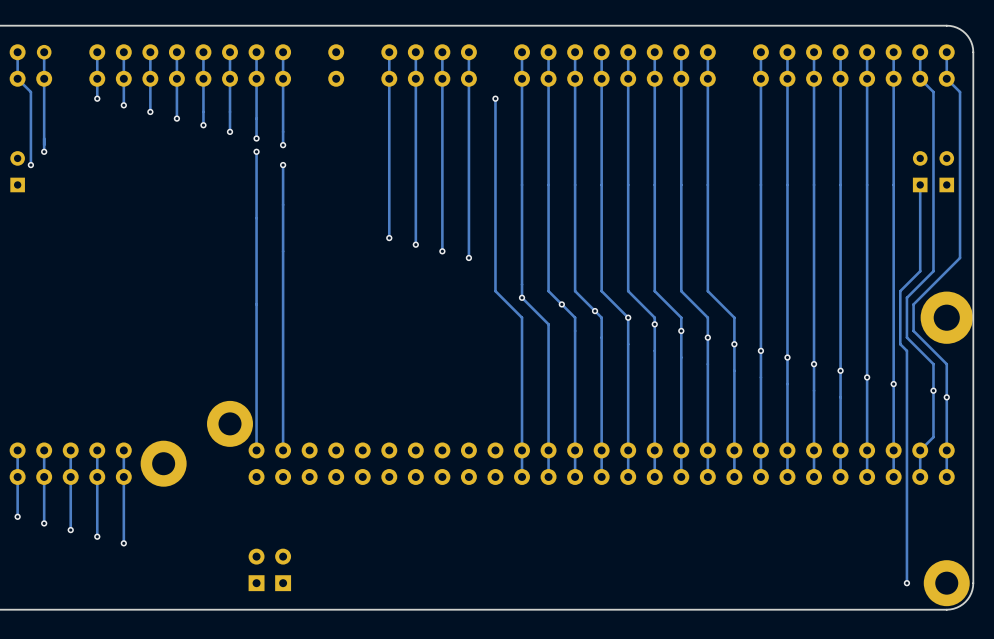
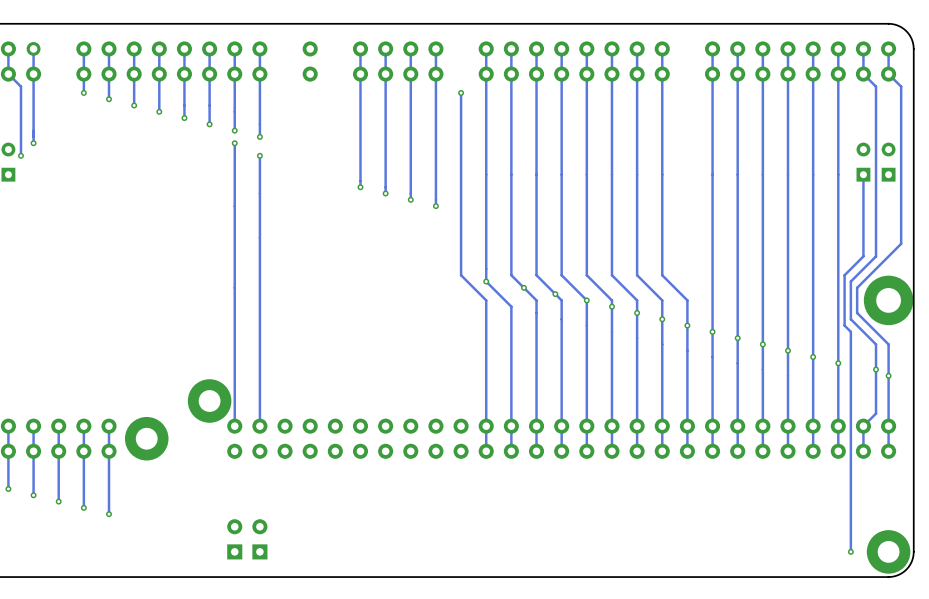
track: (389, 198) (389, 238) -> none
via: none -> (360, 187)
track: (415, 204) (415, 244) -> none
via: none -> (385, 193)
track: (442, 211) (442, 251) -> none
via: none -> (410, 199)
track: (468, 218) (468, 257) -> none
via: none -> (435, 206)
via: (389, 238) -> none
via: (415, 244) -> none
via: (442, 251) -> none
via: (468, 257) -> none

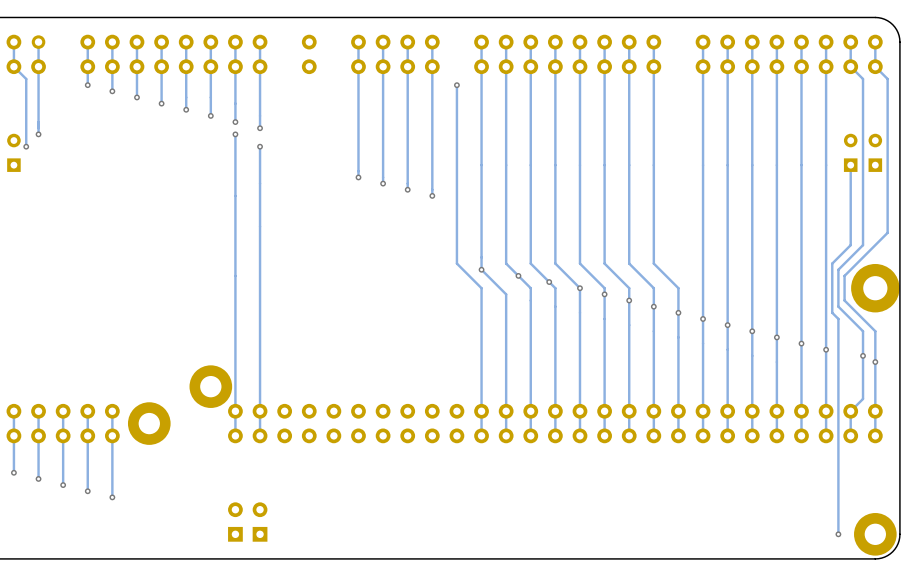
track: none -> (235, 411) (235, 435)
track: none -> (260, 411) (260, 435)

